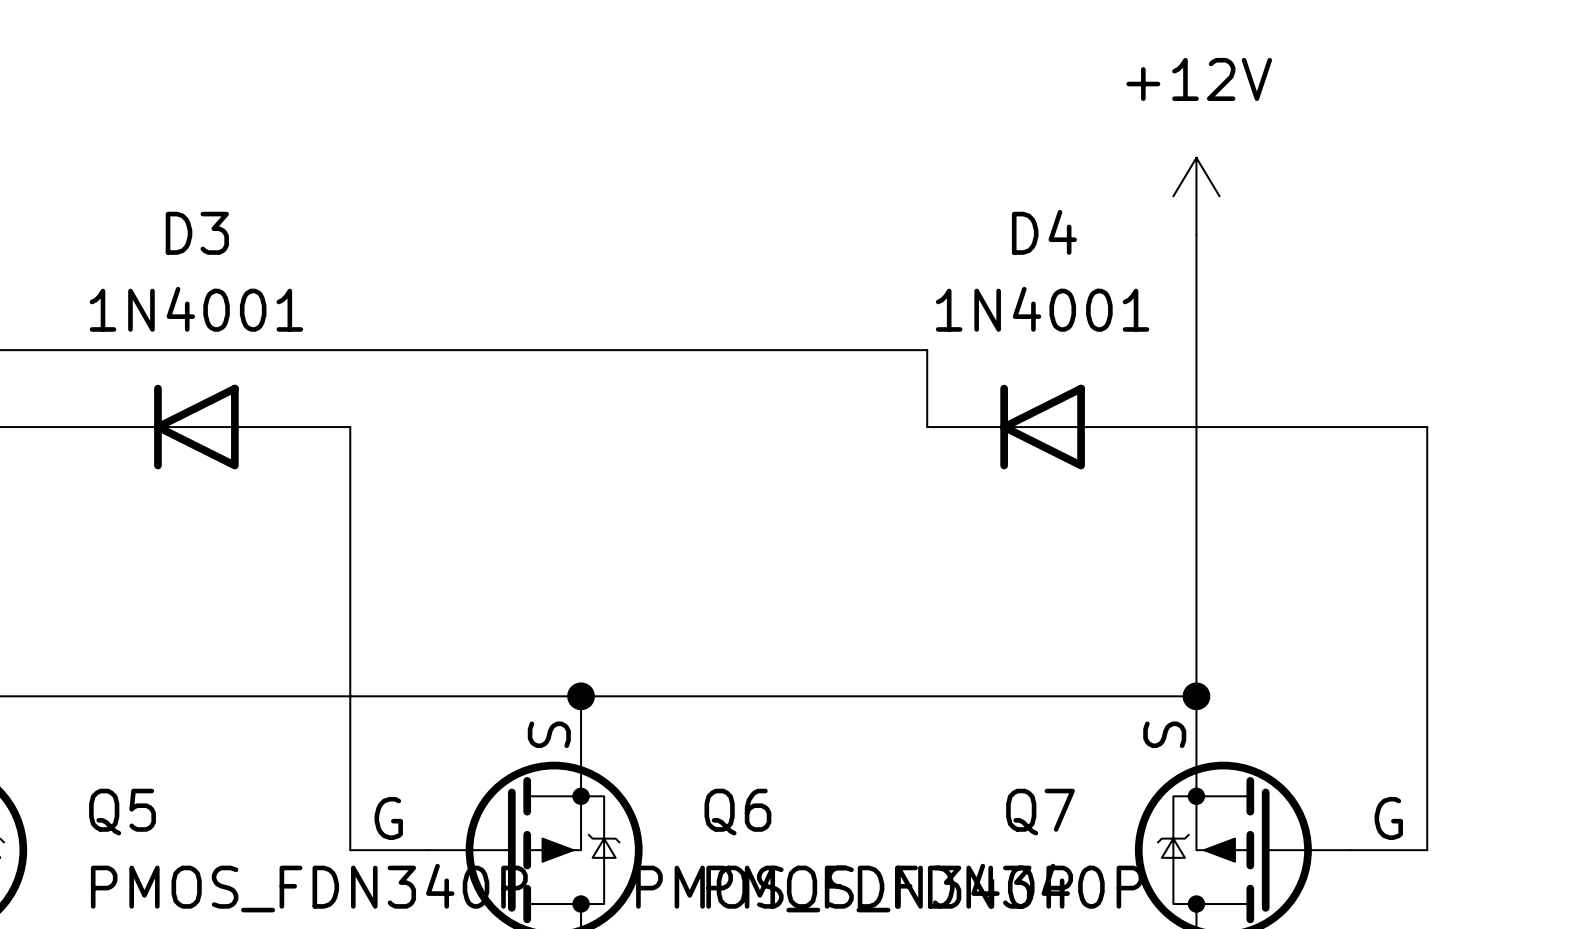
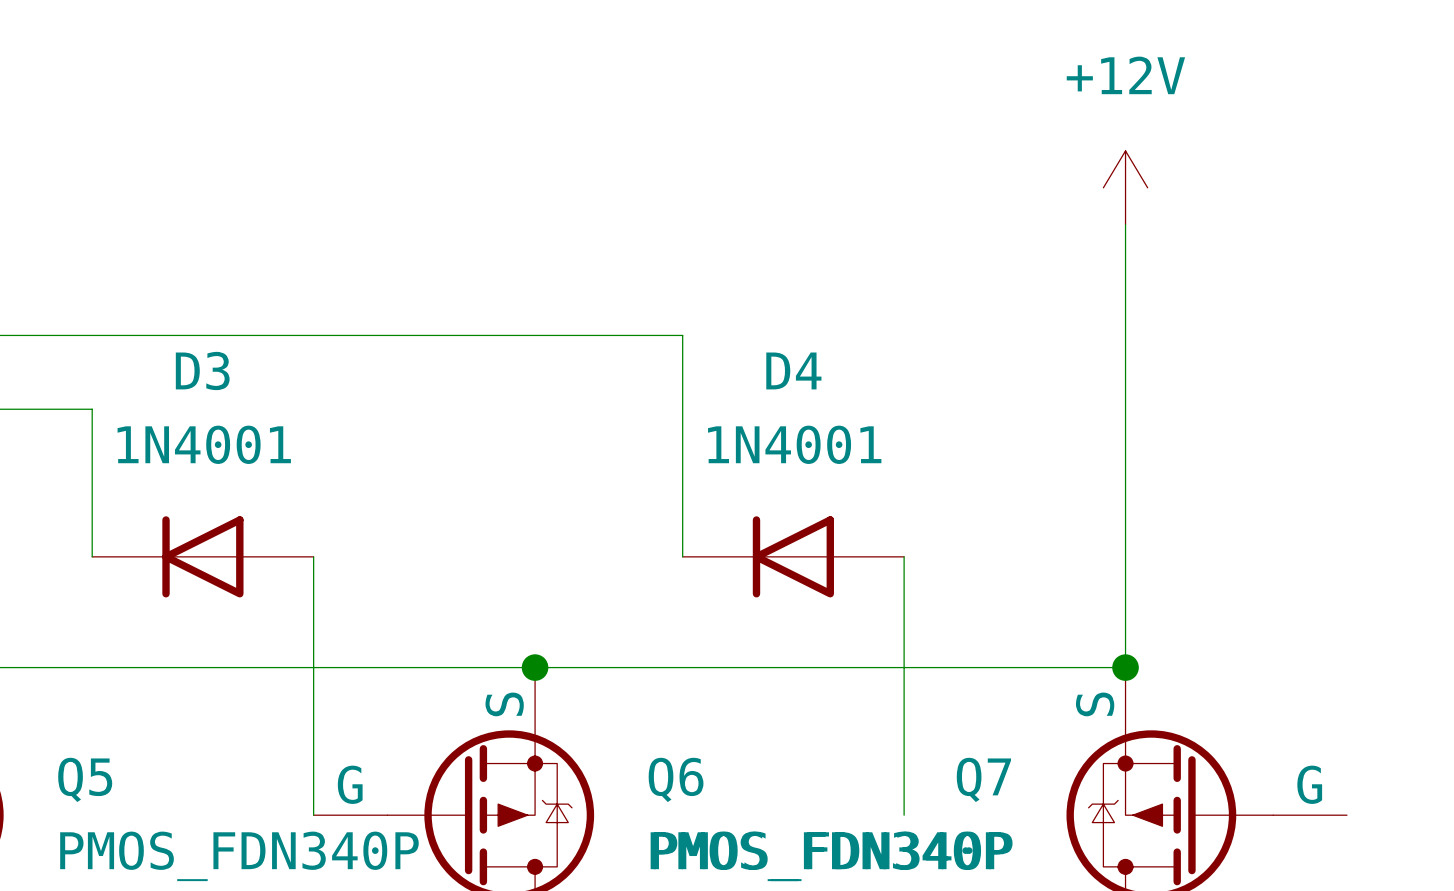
wire: (734, 350) (927, 350) (927, 427) -> (682, 335) (682, 556)
D3 position: (196, 427) -> (202, 556)
wire: (311, 427) (350, 427) (350, 580) -> (55, 409) (92, 409) (92, 556)
D4 position: (1042, 427) -> (793, 556)
wire: (1157, 427) (1427, 427) (1427, 850) -> none
wire: none -> (904, 556) (904, 815)

